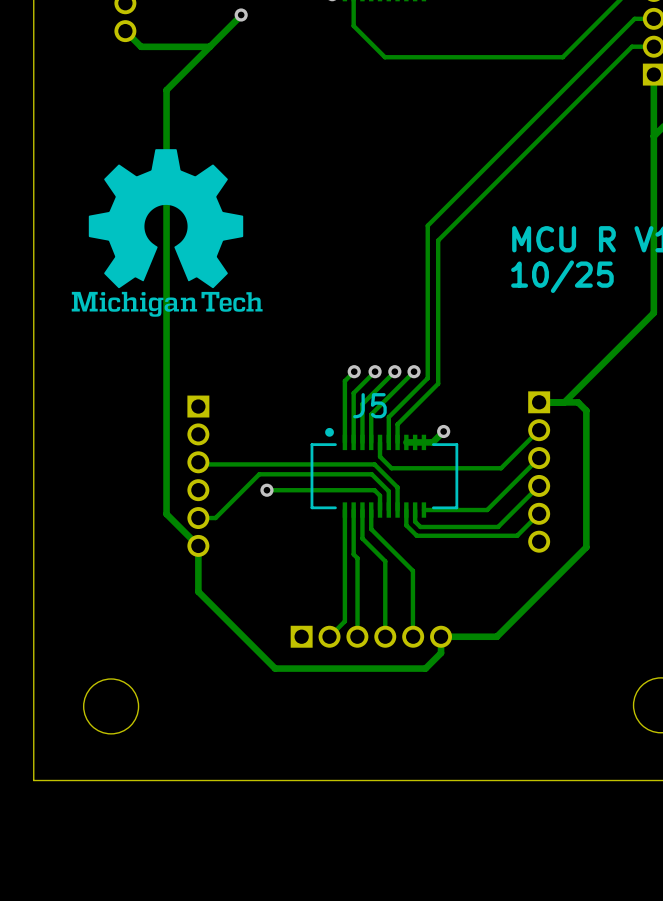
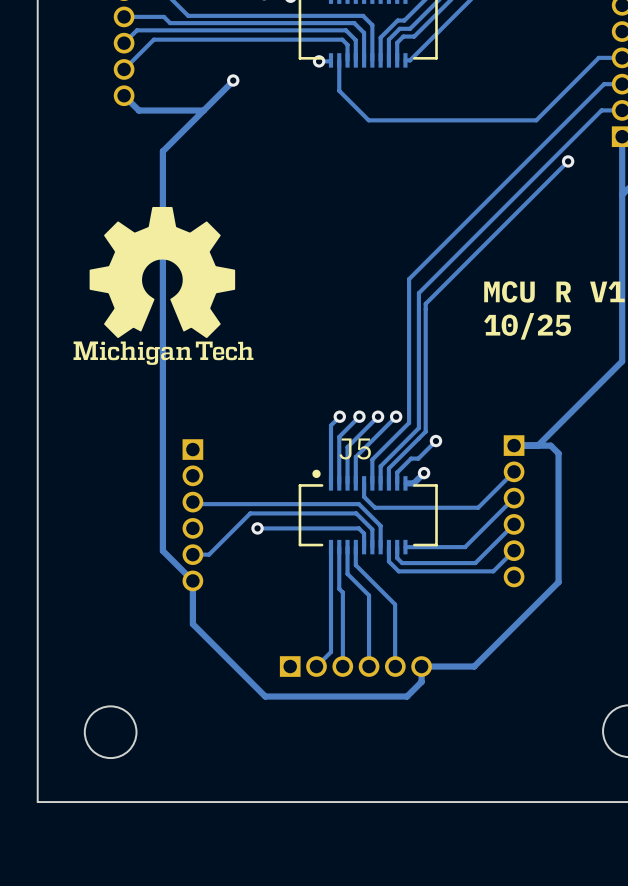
via: none -> (568, 161)
track: none -> (435, 441) (418, 458) (411, 458) (397, 472) (397, 483)
via: none -> (435, 441)
track: (425, 442) (406, 442) -> (568, 161) (425, 303) (425, 431) (388, 468) (388, 483)

